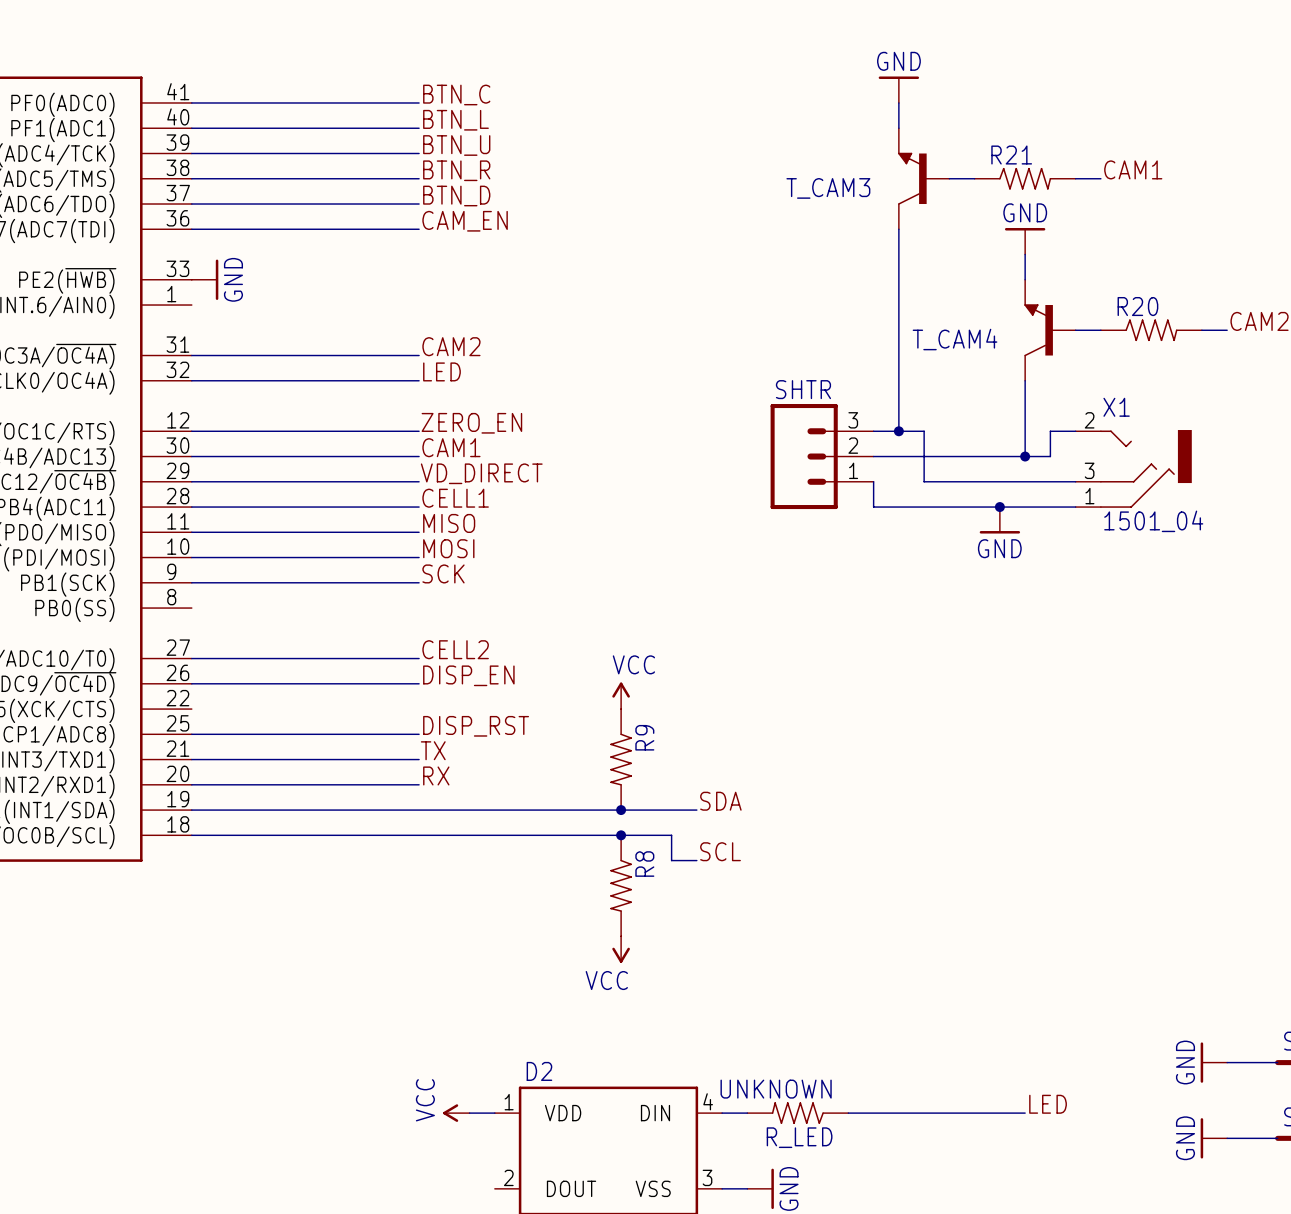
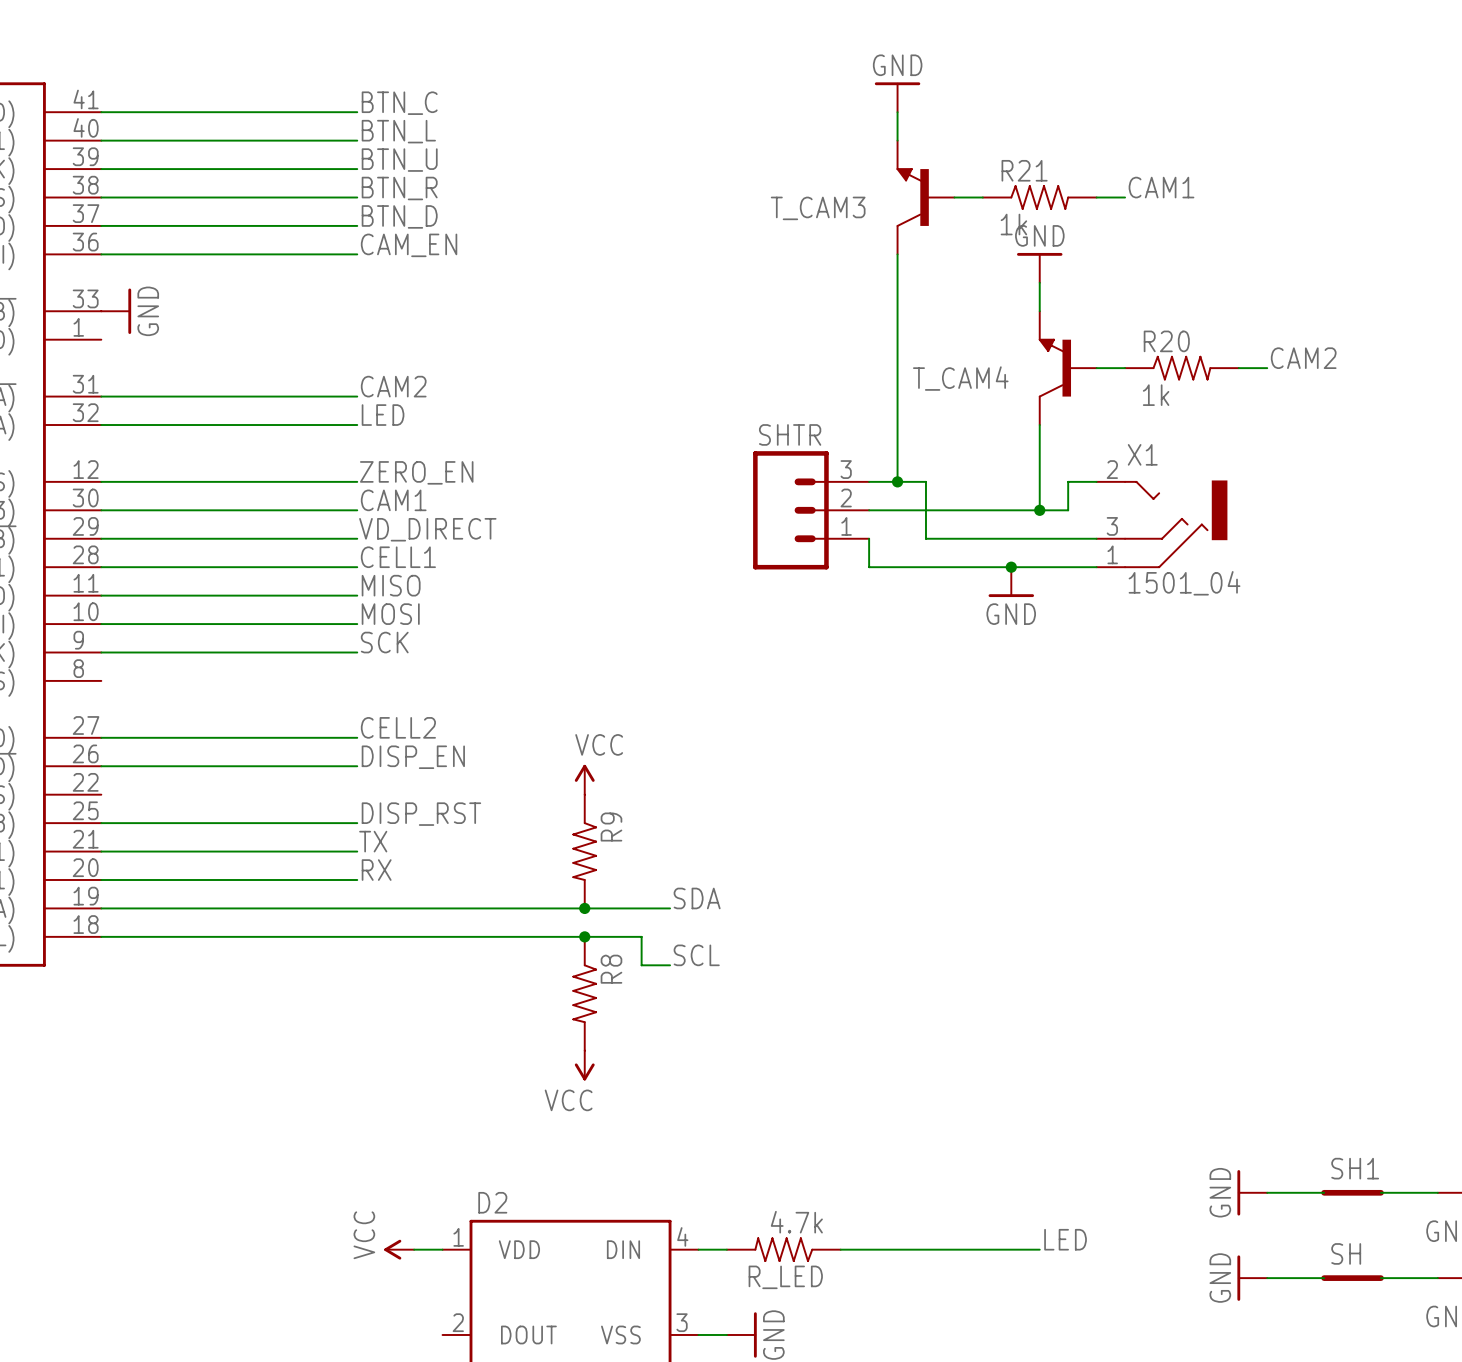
R21 value: none -> 1k (1013, 224)
R20 value: none -> 1k (1156, 395)
R_LED value: UNKNOWN (776, 1089) -> 4.7k (796, 1222)

